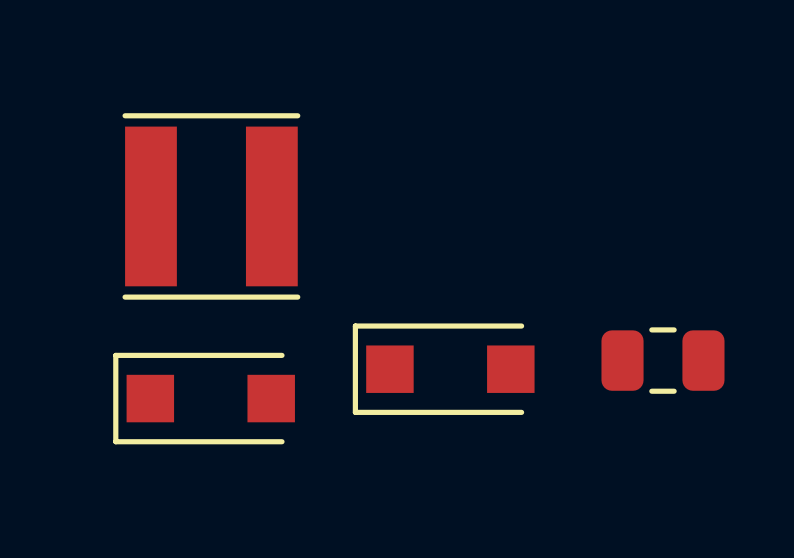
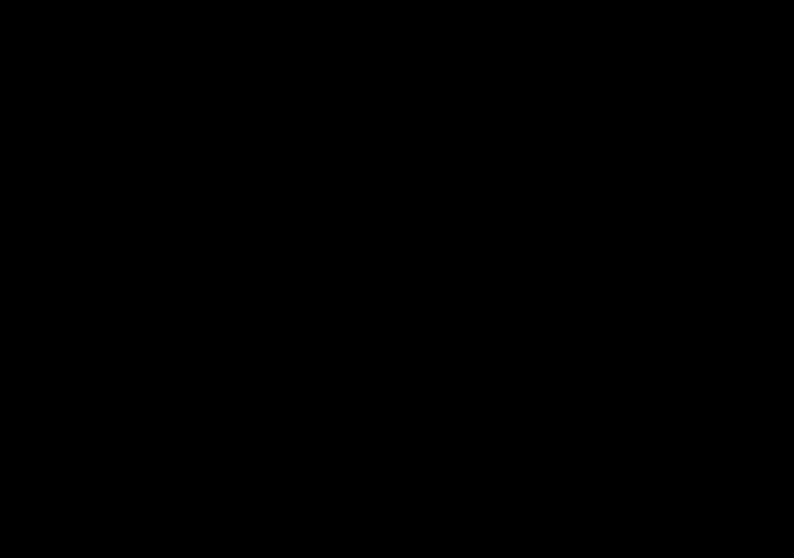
part: (211, 206) -> none
part: (662, 360) -> none
part: (443, 369) -> none
part: (204, 398) -> none

